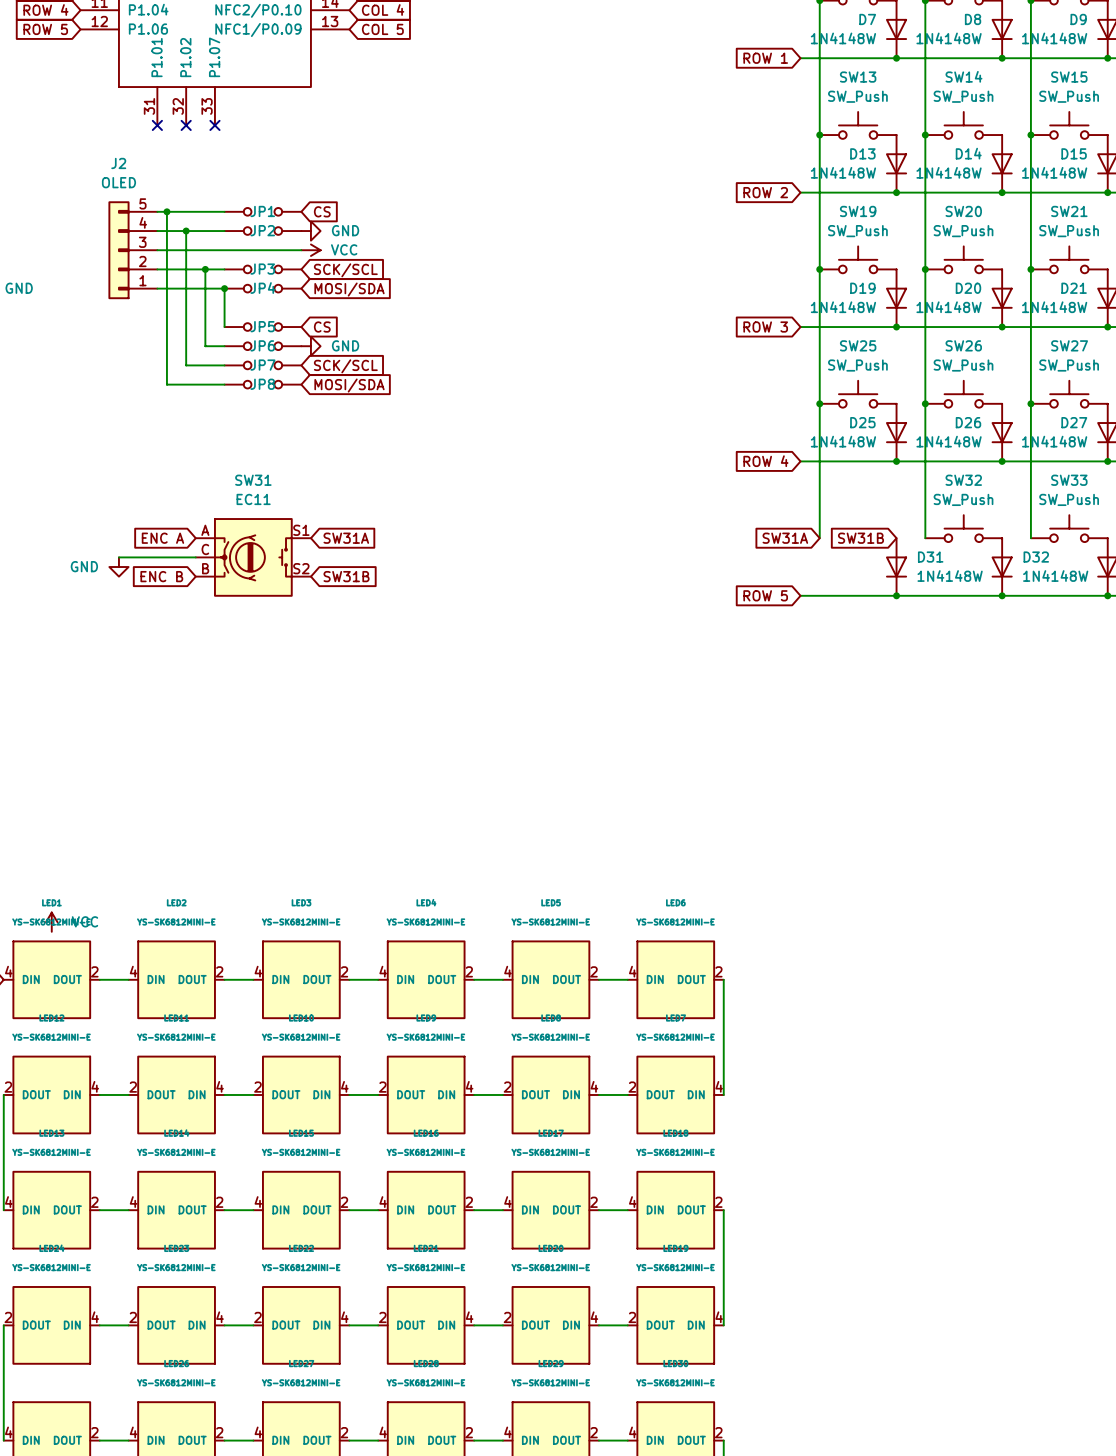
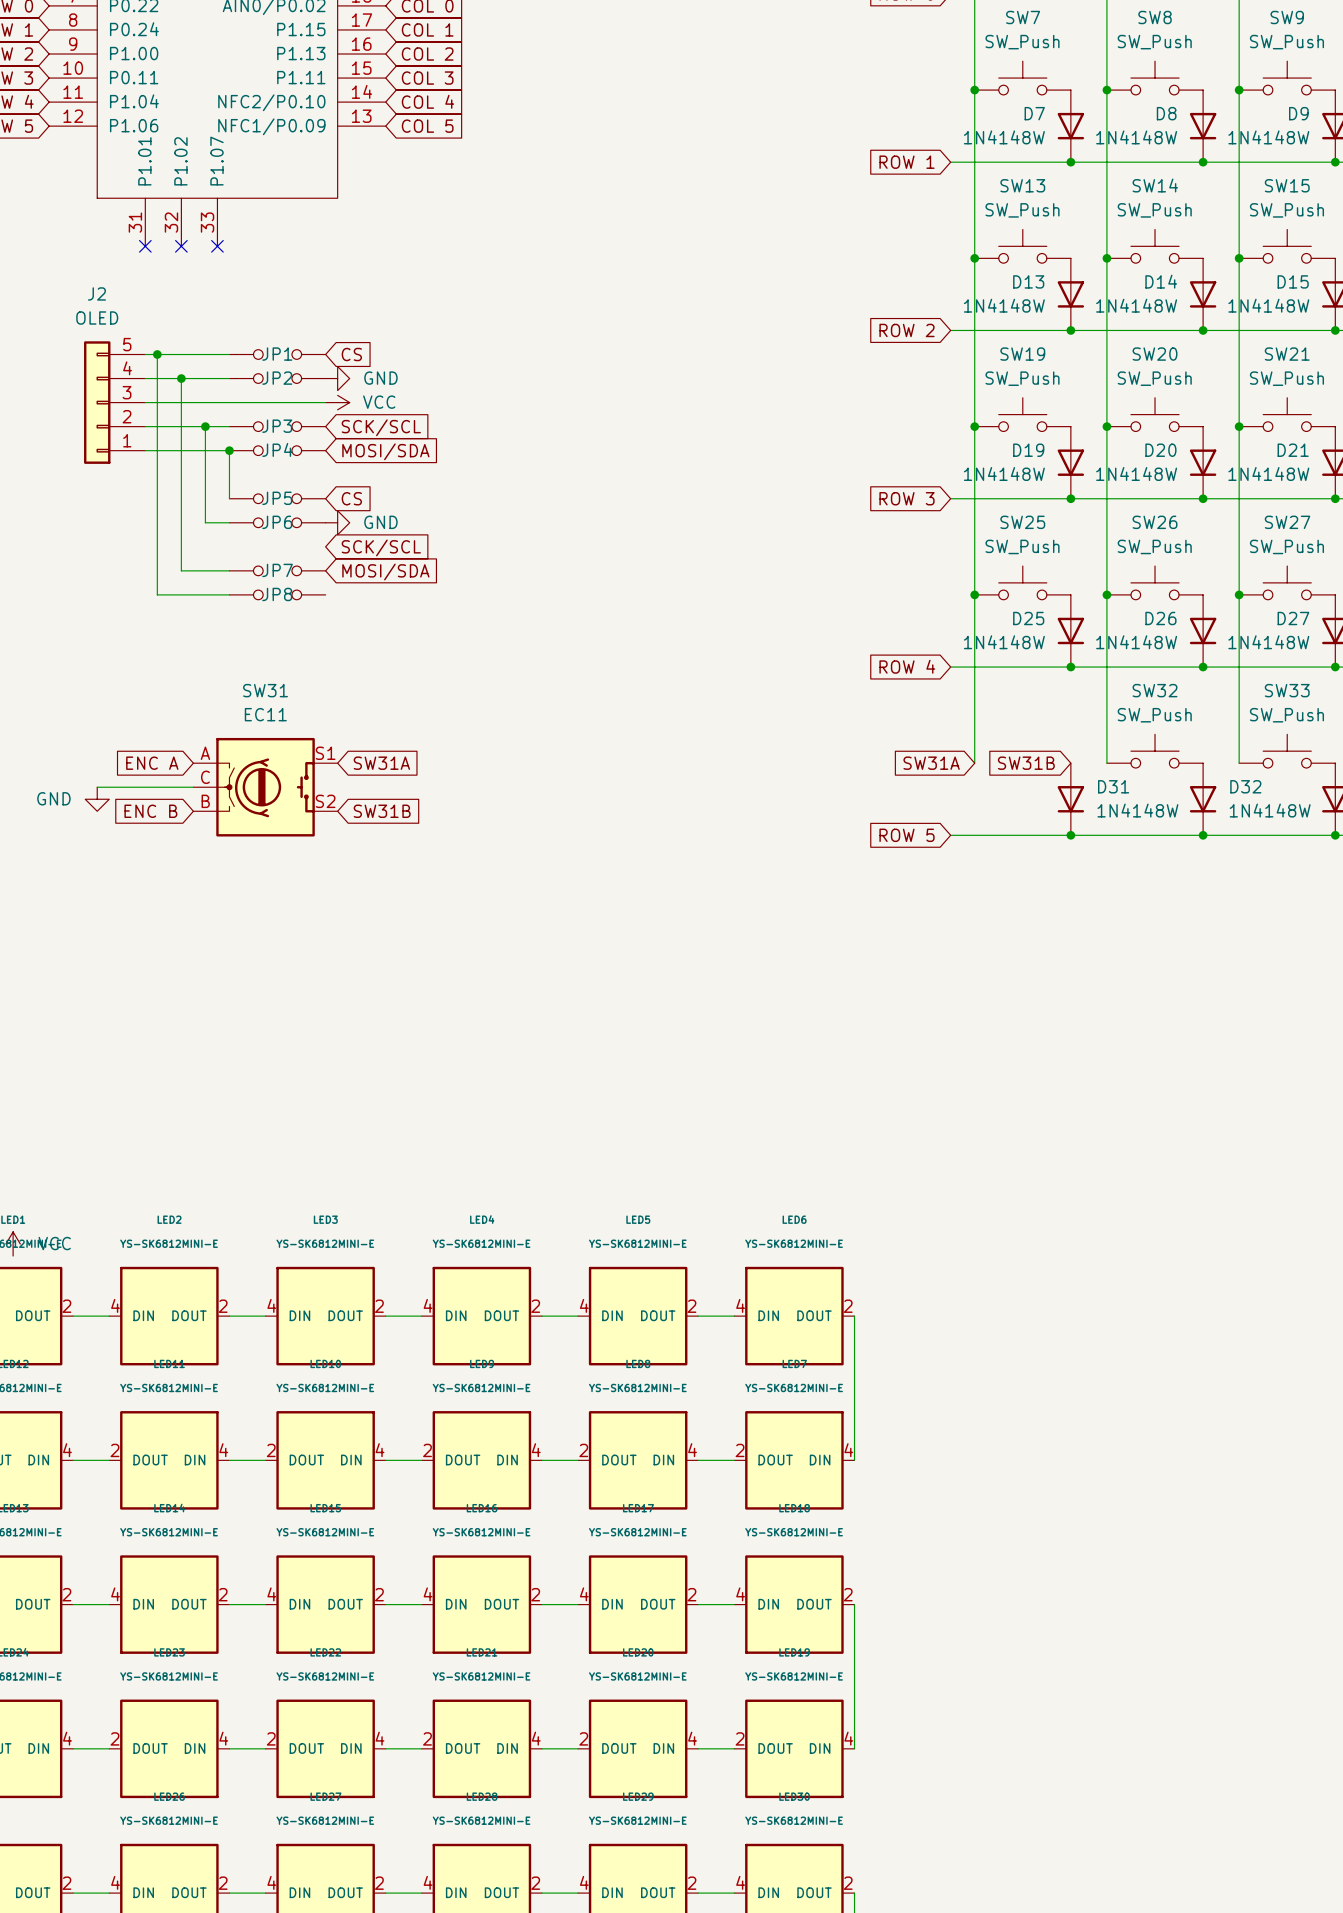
wire: (186, 365) (224, 365) -> none
JP7: (262, 365) -> none
wire: (166, 384) (186, 384) -> (181, 546) (181, 570)
wire: none -> (157, 570) (157, 594) (229, 594)
JP8 name: JP8 (262, 384) -> JP7 (277, 570)
JP8: none -> (277, 594)

